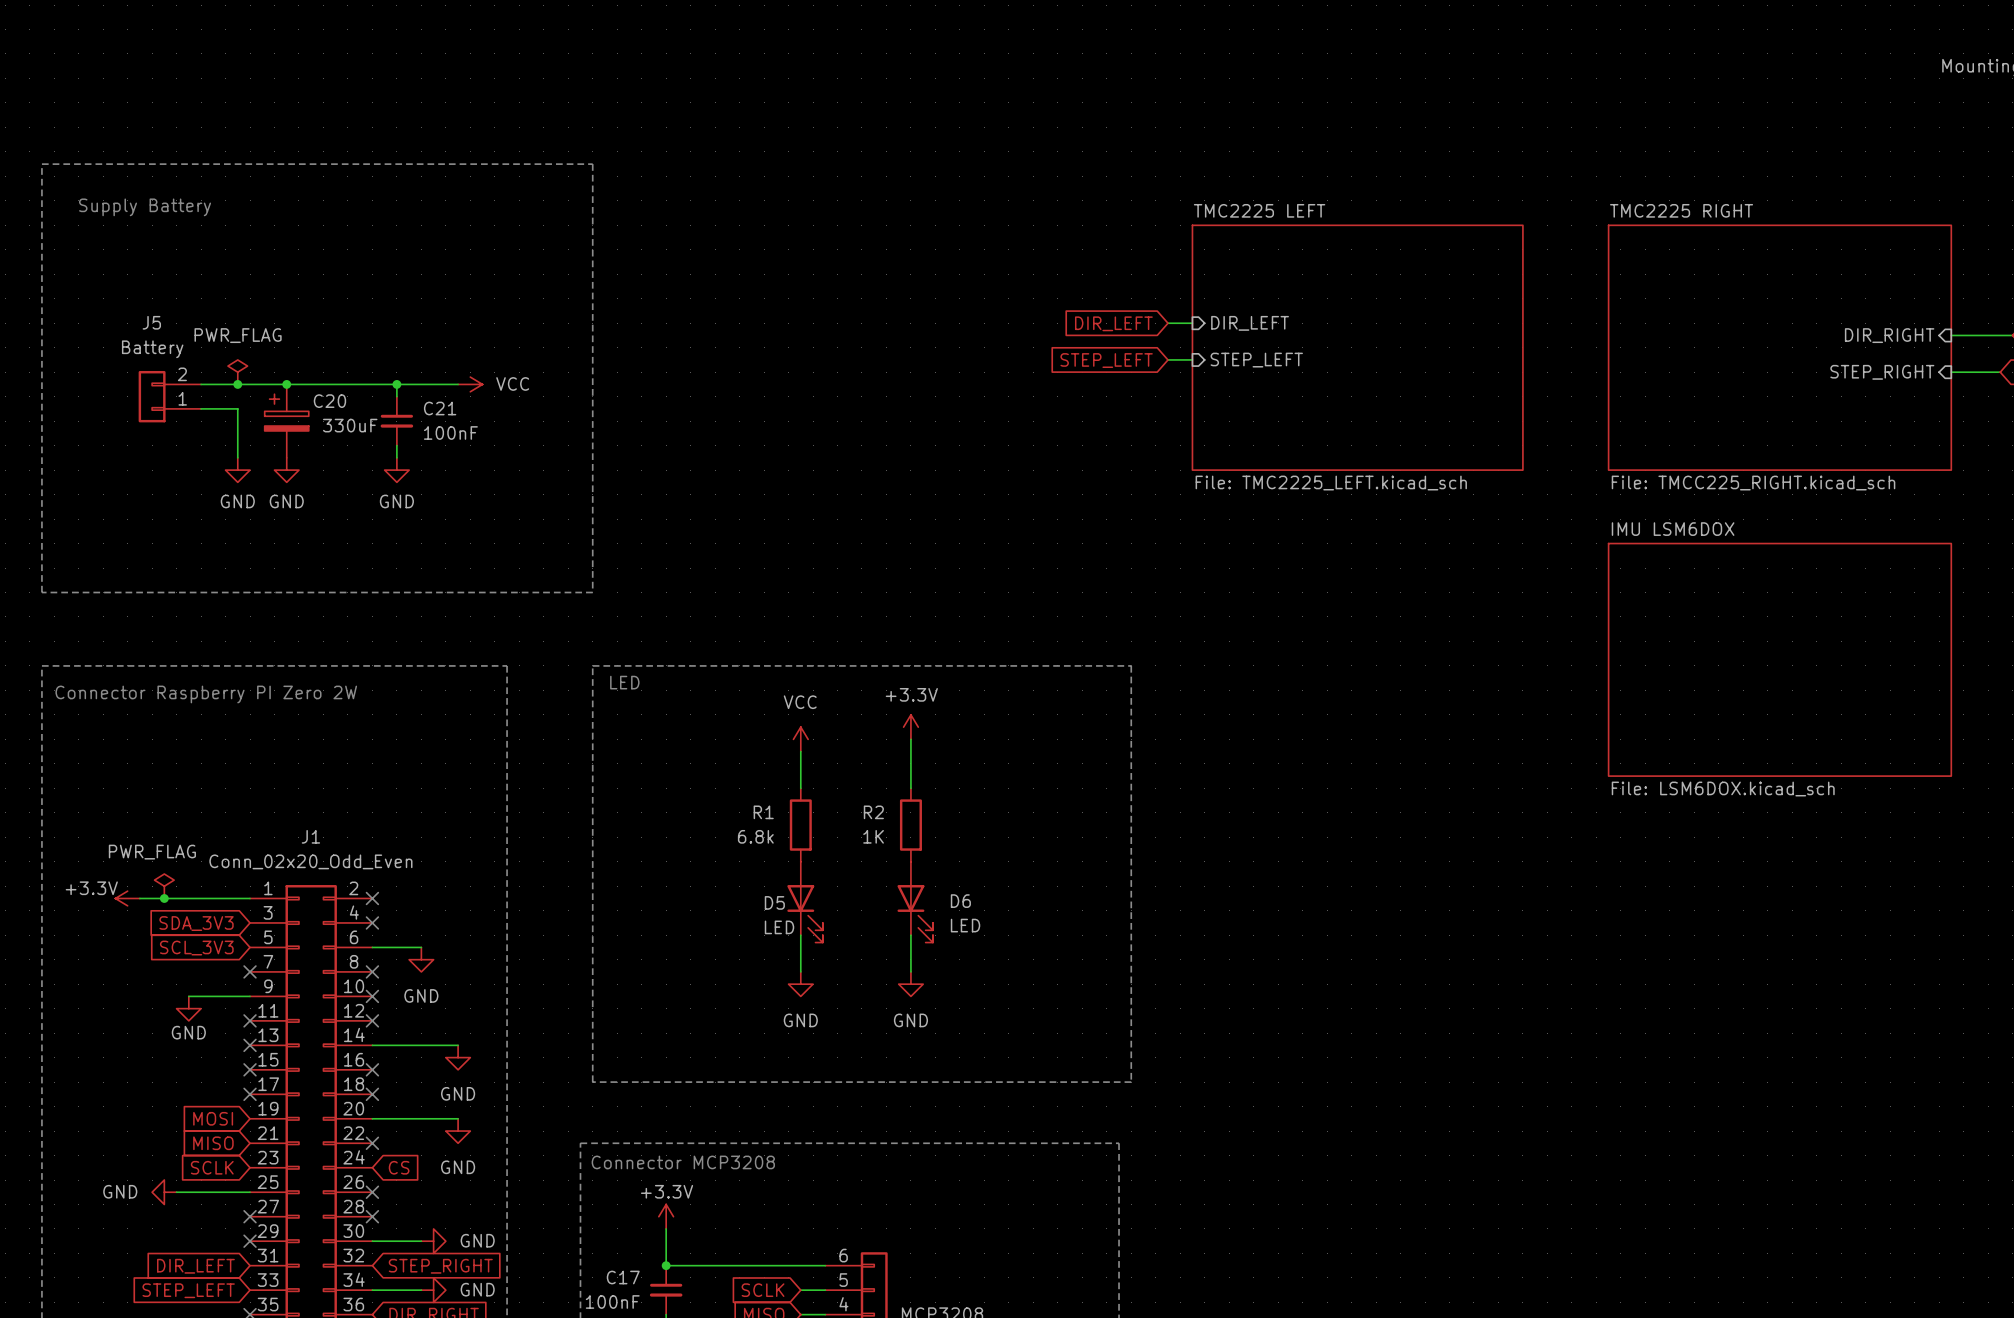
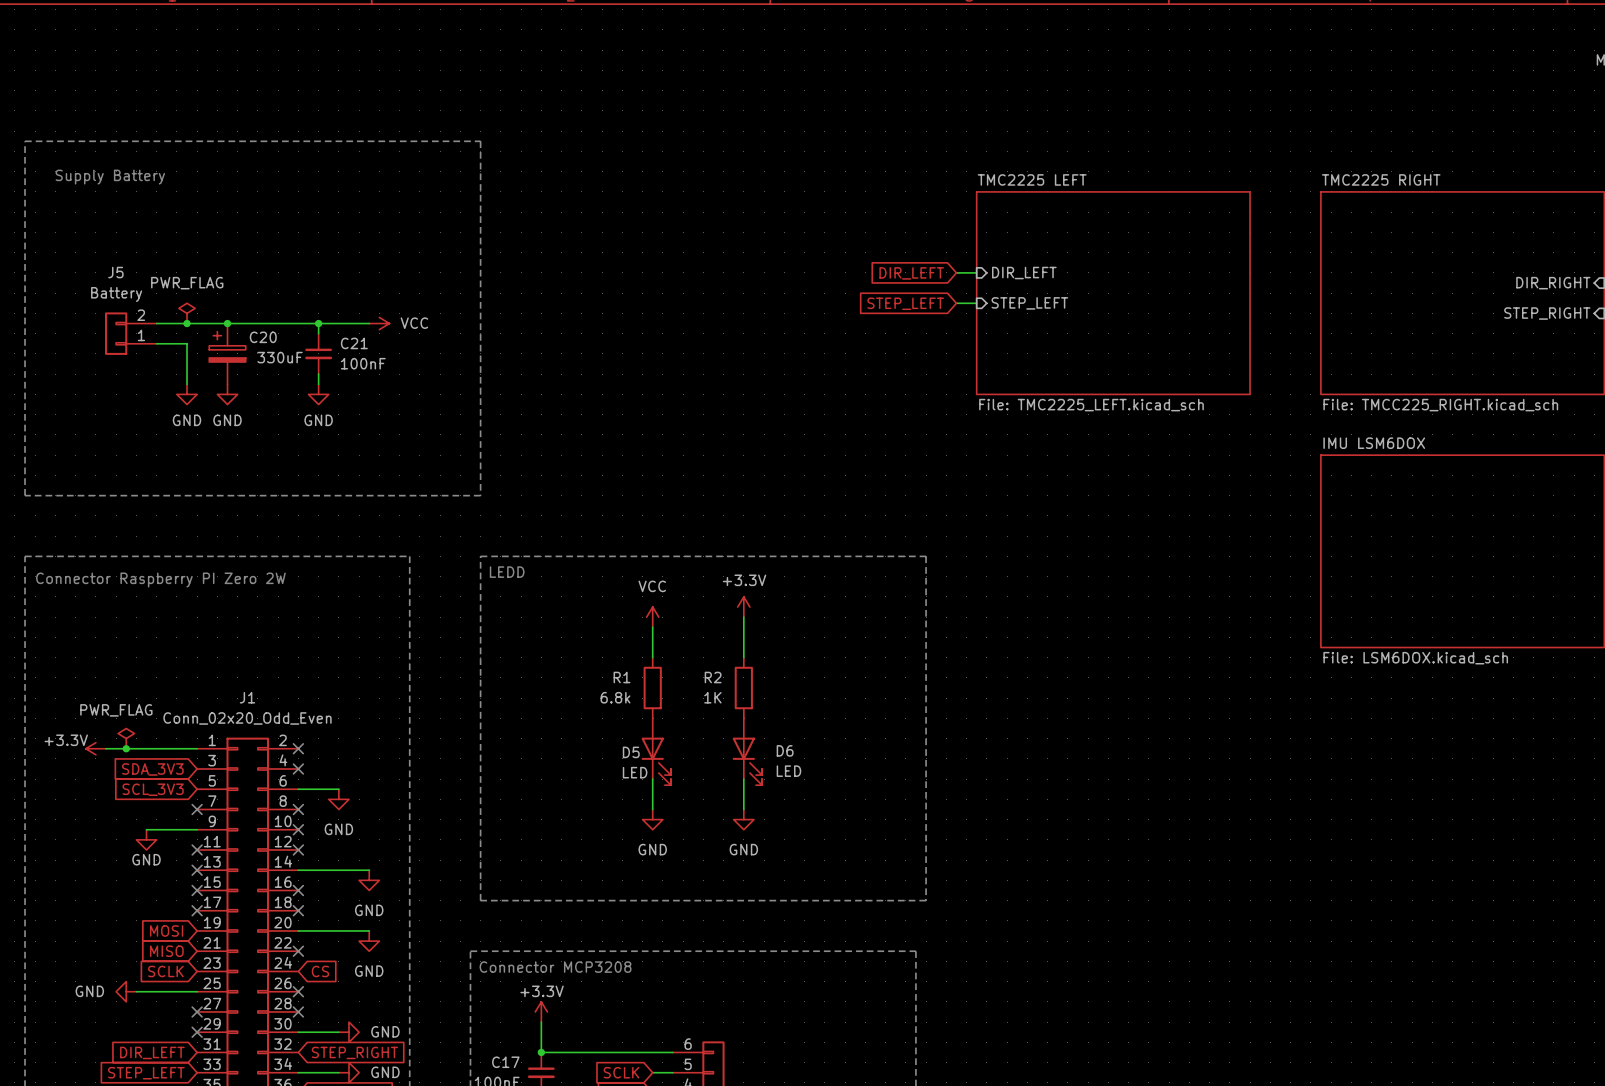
text: LED (624, 682) -> LEDD (507, 572)

